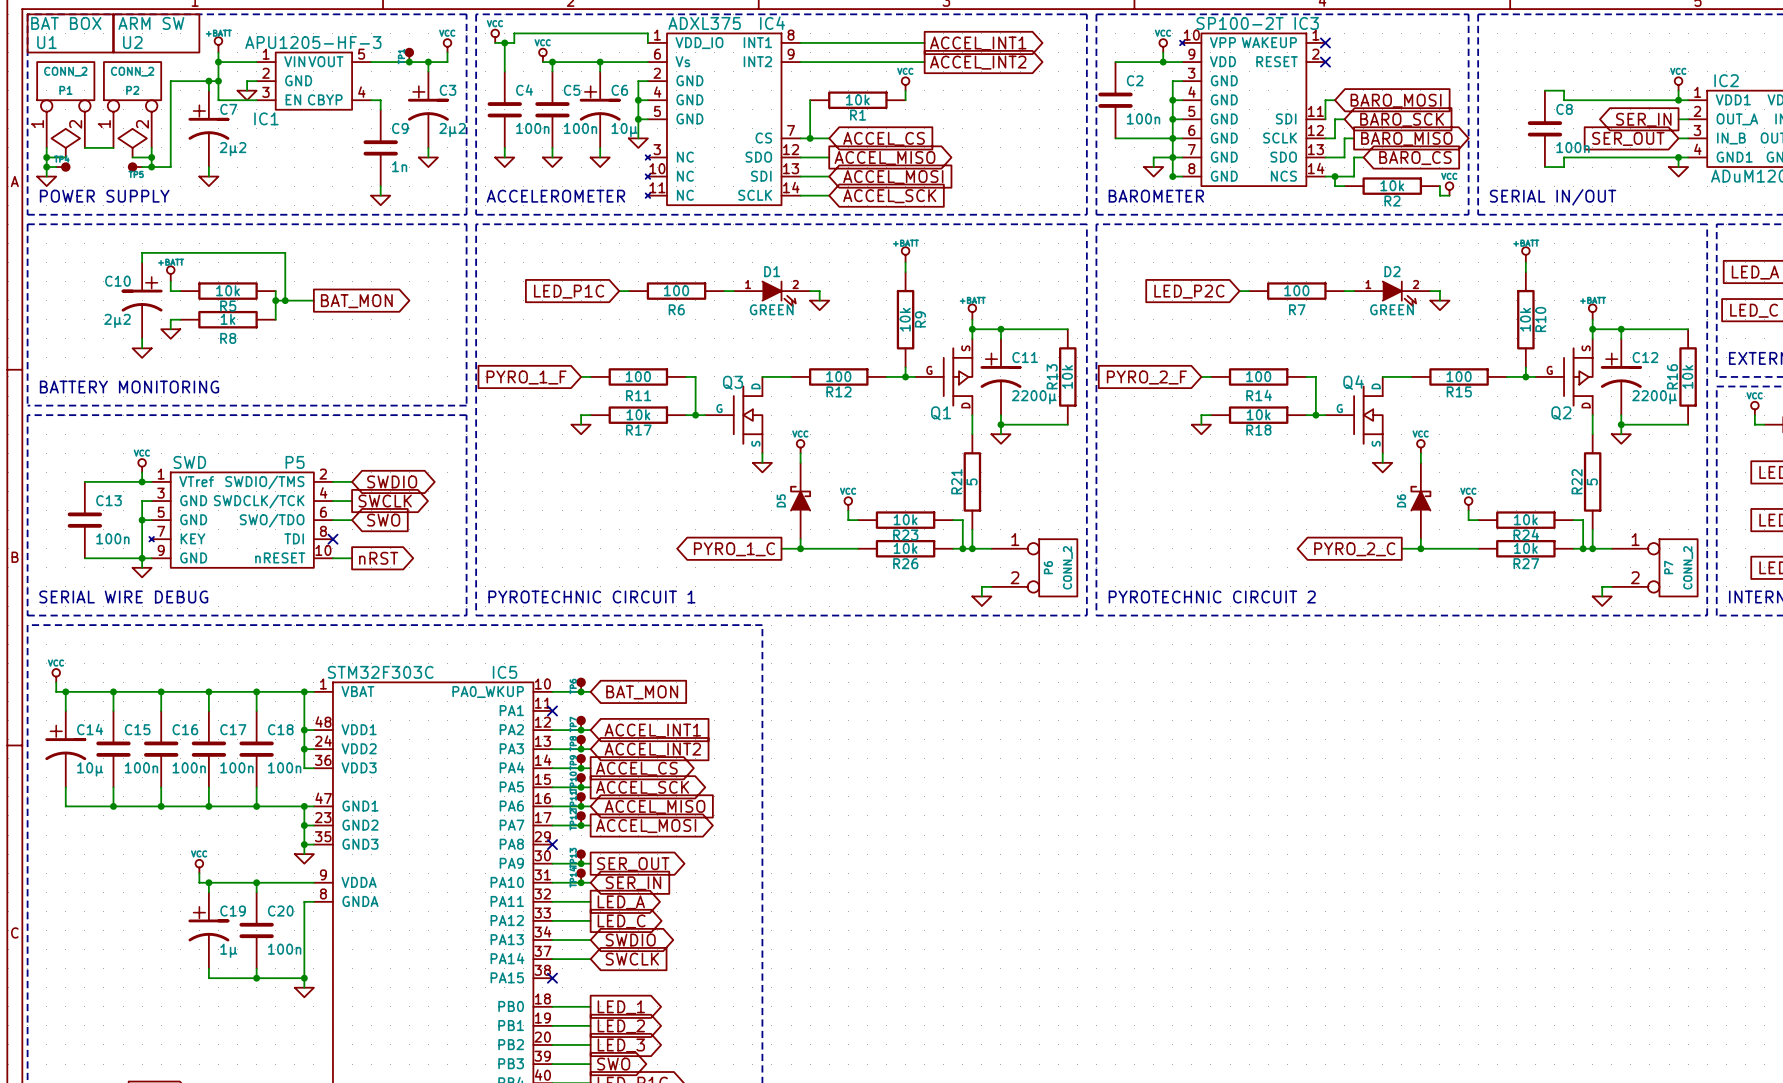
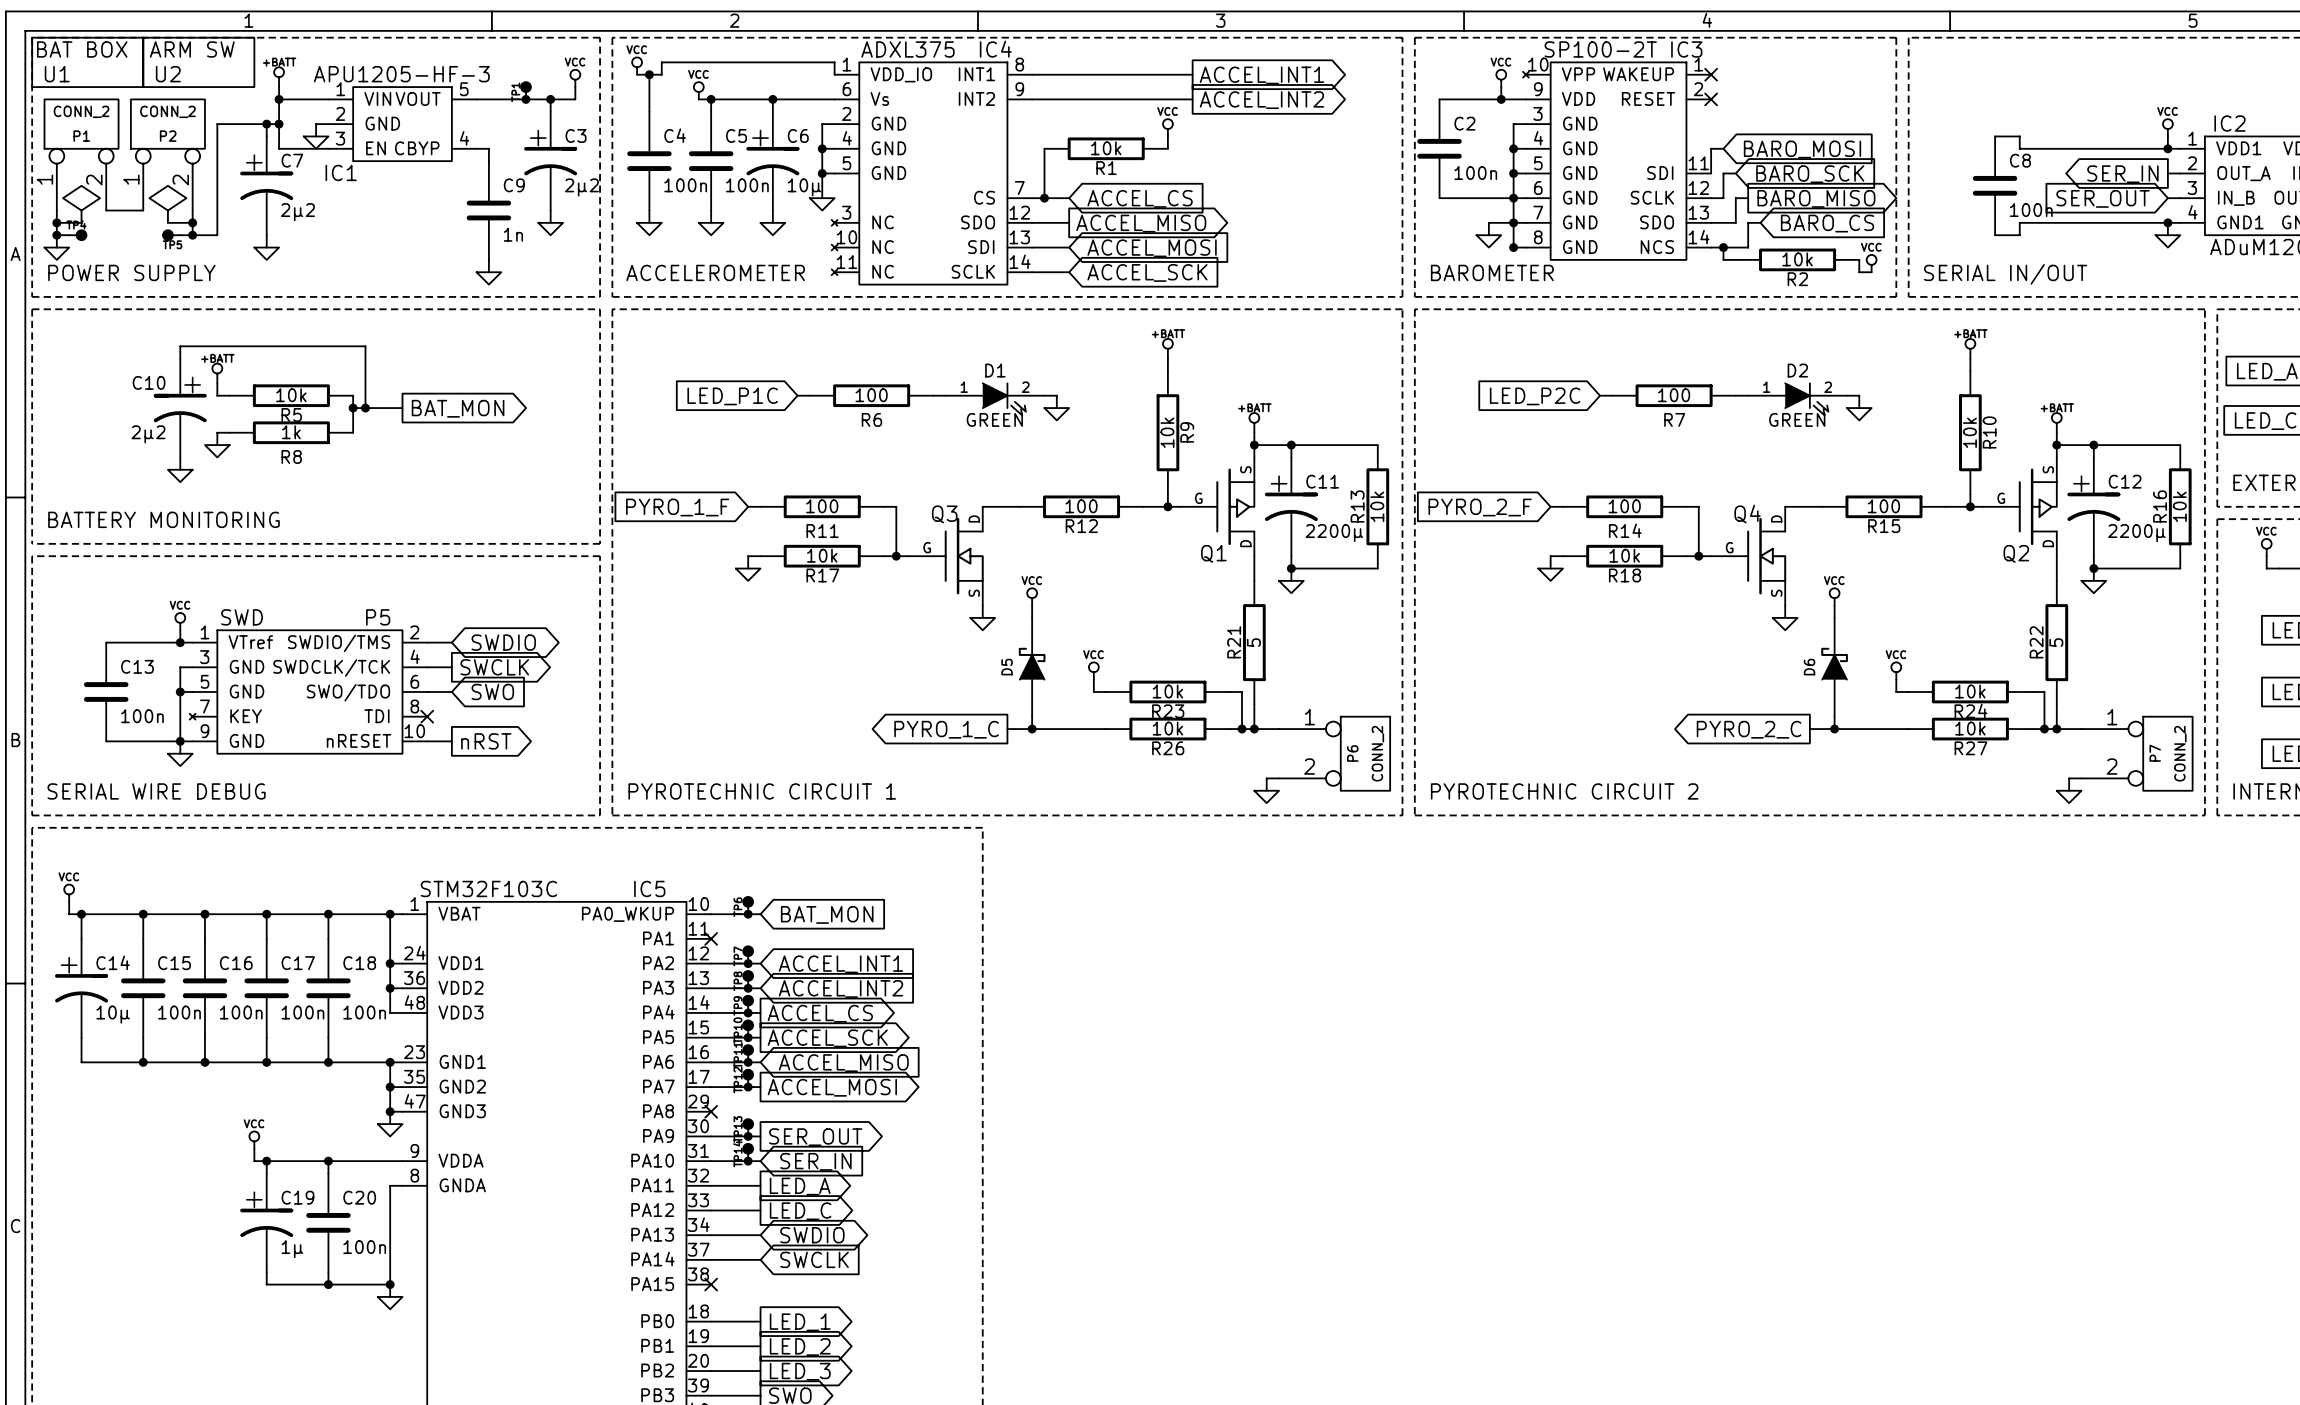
IC5 value: STM32F303C (380, 672) -> STM32F103C (488, 888)
IC5 pin number: 48 (323, 721) -> 24 (414, 953)
IC5 pin number: 24 (323, 741) -> 36 (414, 978)
IC5 pin number: 36 (323, 760) -> 48 (414, 1002)
IC5 pin number: 47 (323, 798) -> 23 (414, 1052)
IC5 pin number: 23 (323, 817) -> 35 (414, 1076)
IC5 pin number: 35 (323, 836) -> 47 (415, 1101)

